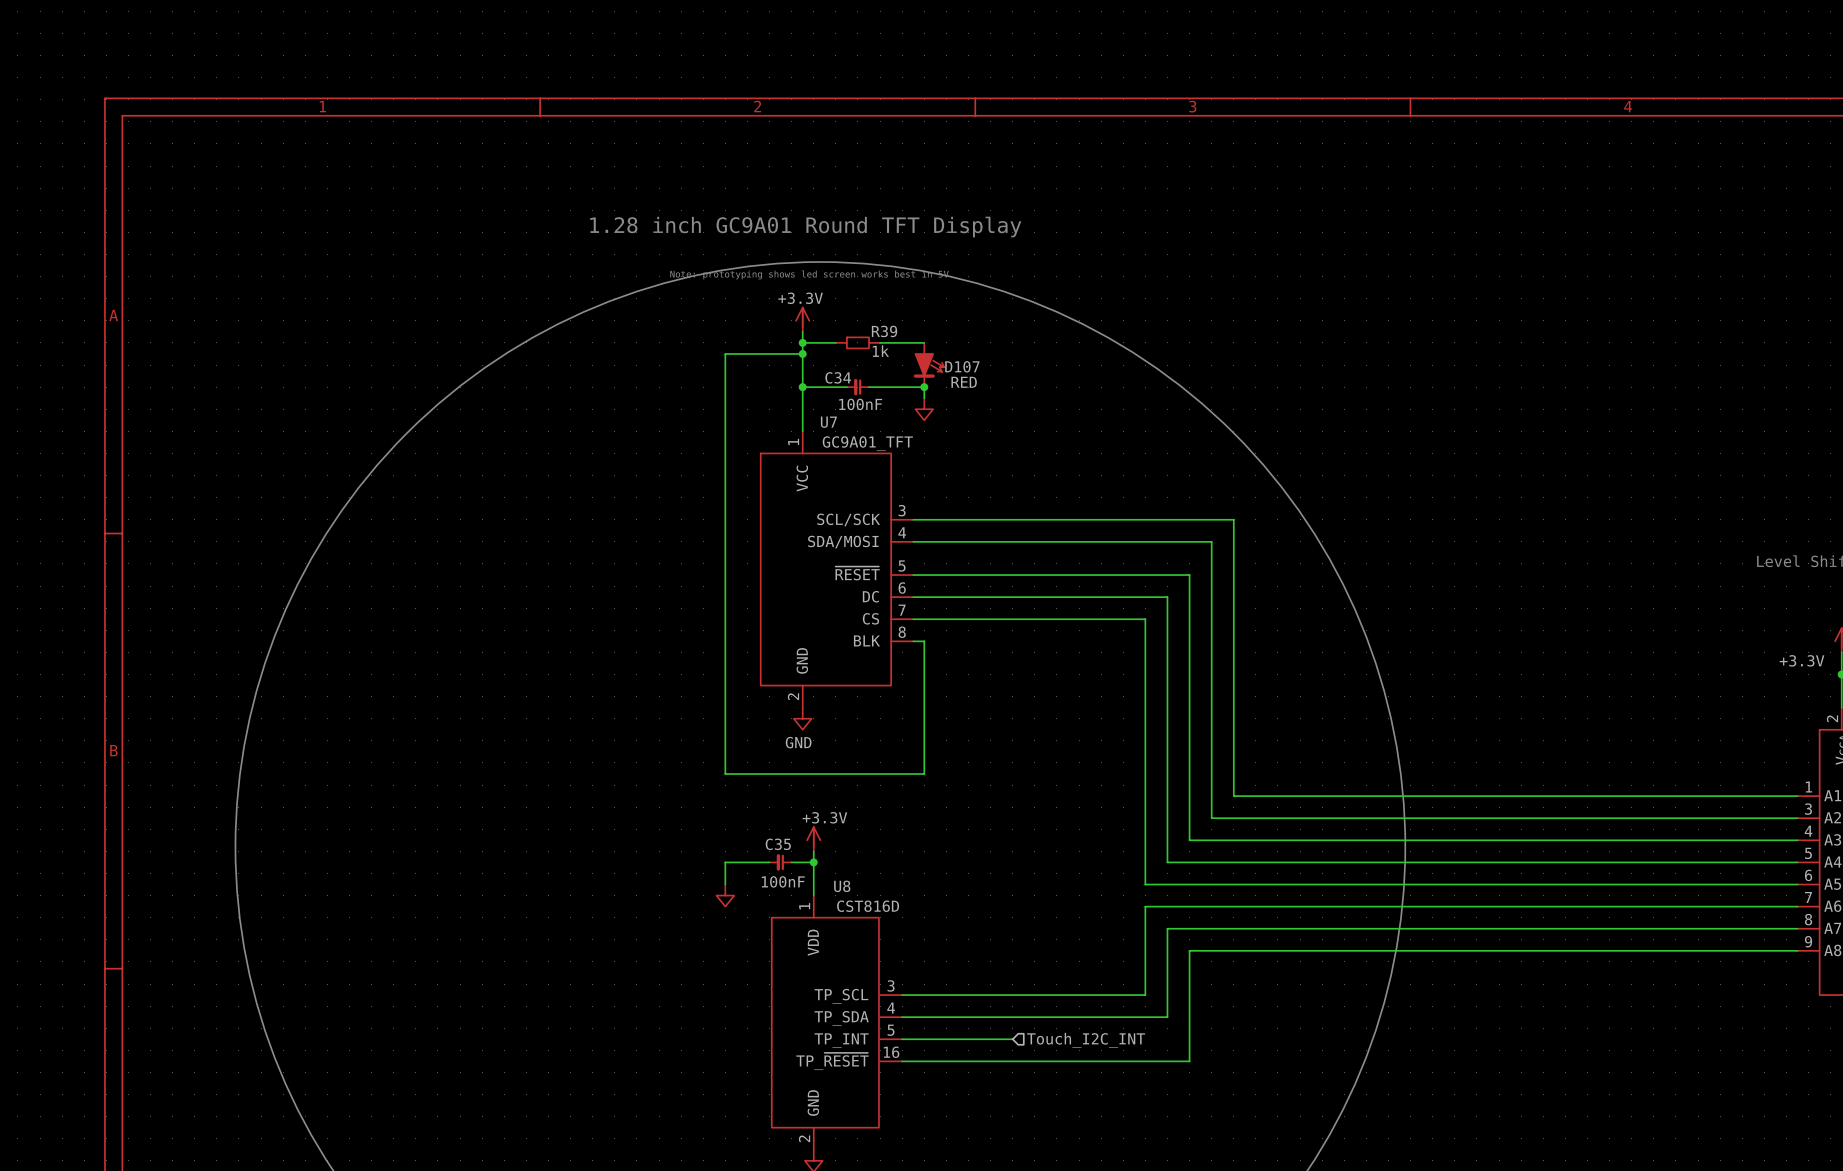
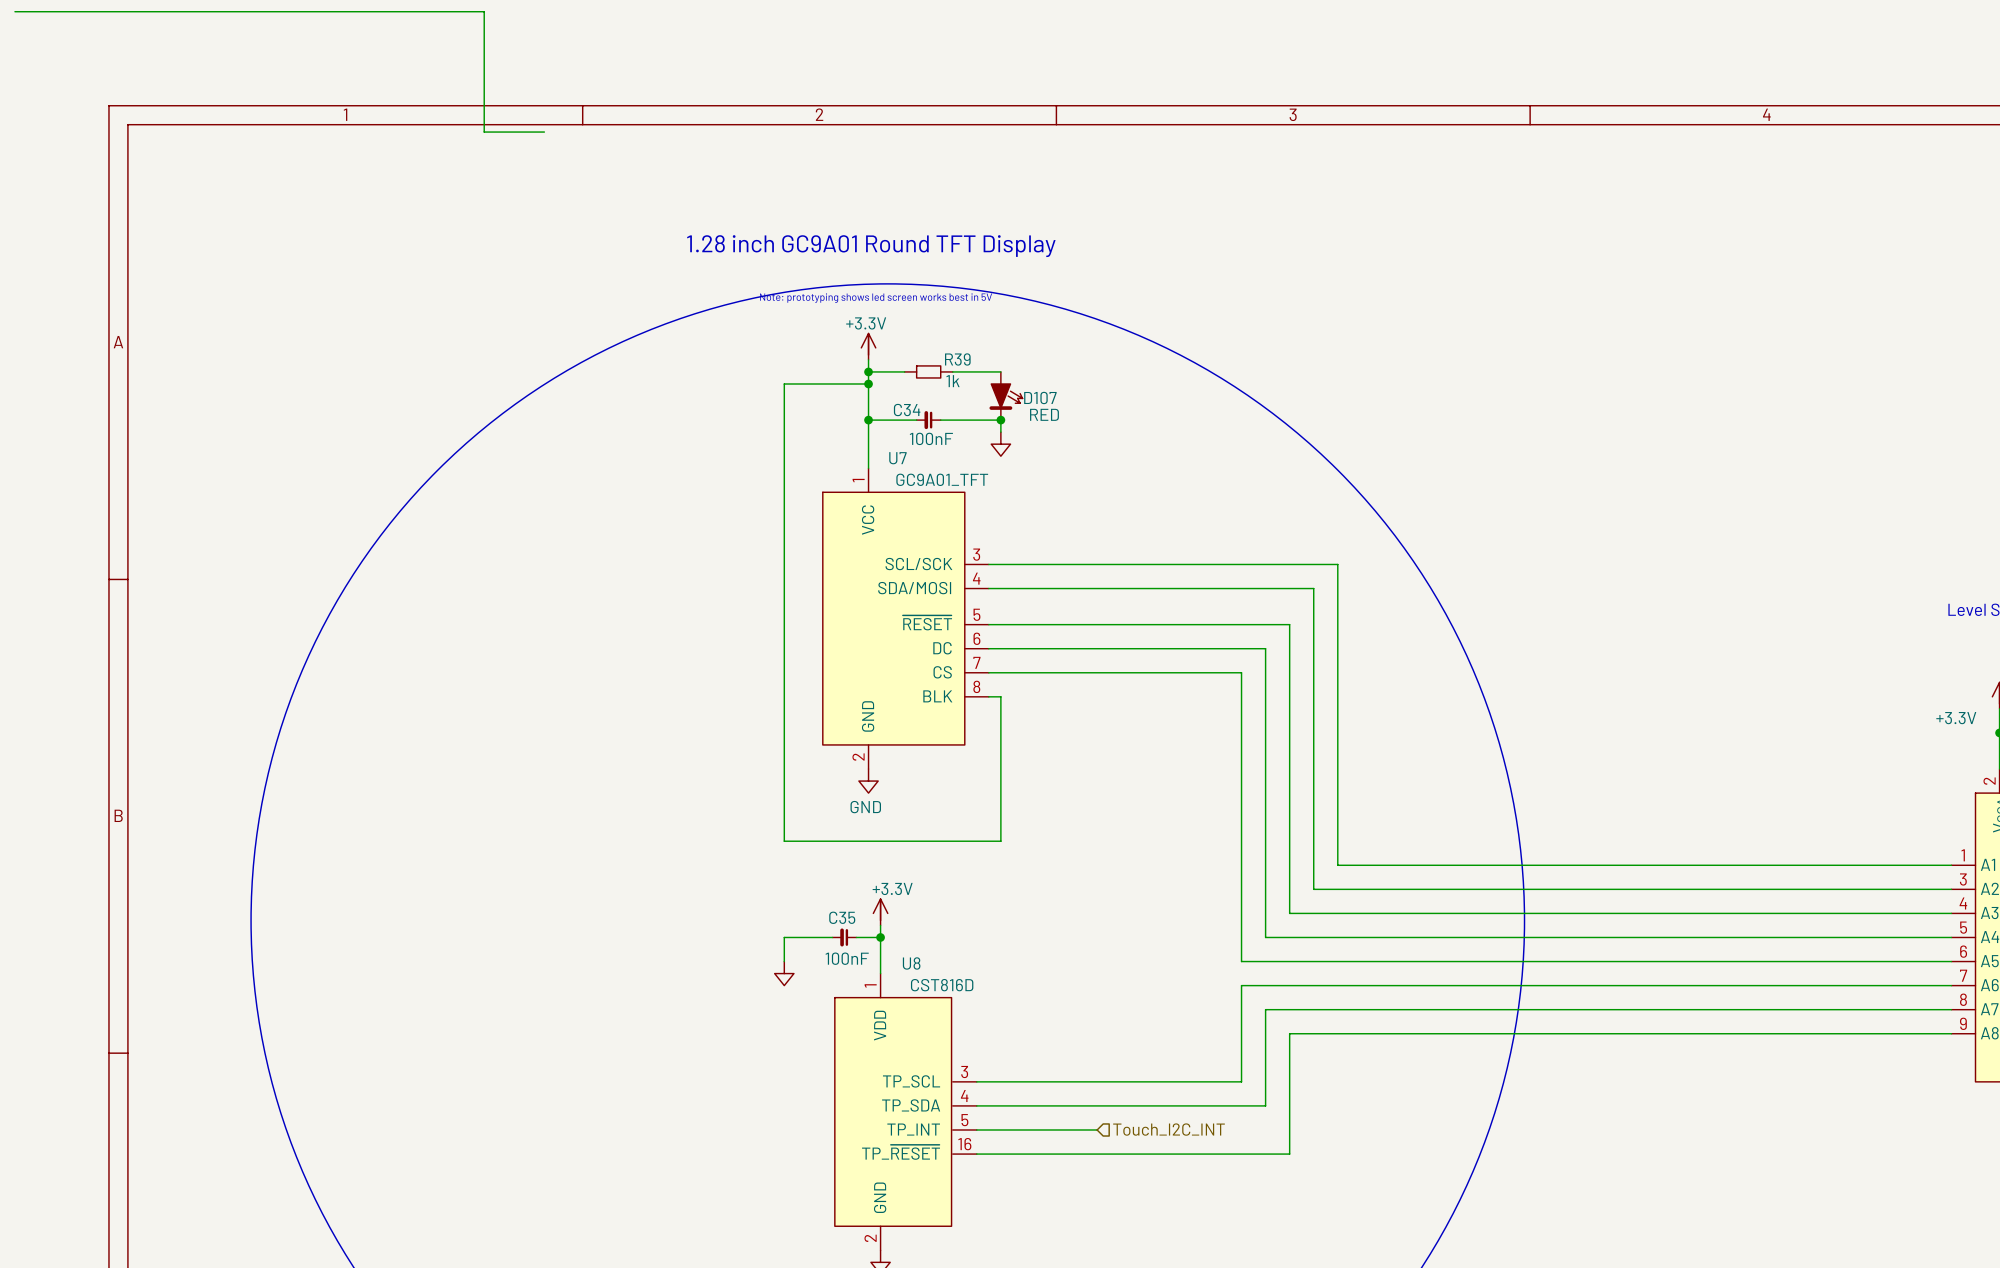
wire: none -> (14, 11) (484, 11) (484, 132) (544, 132)

